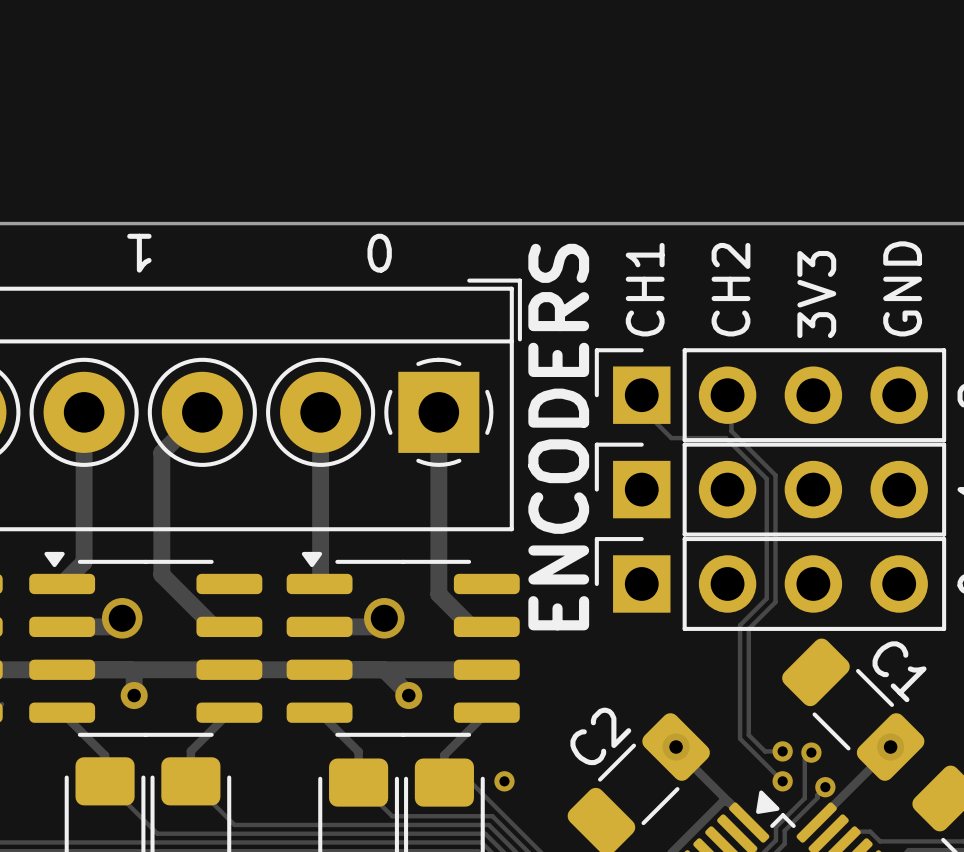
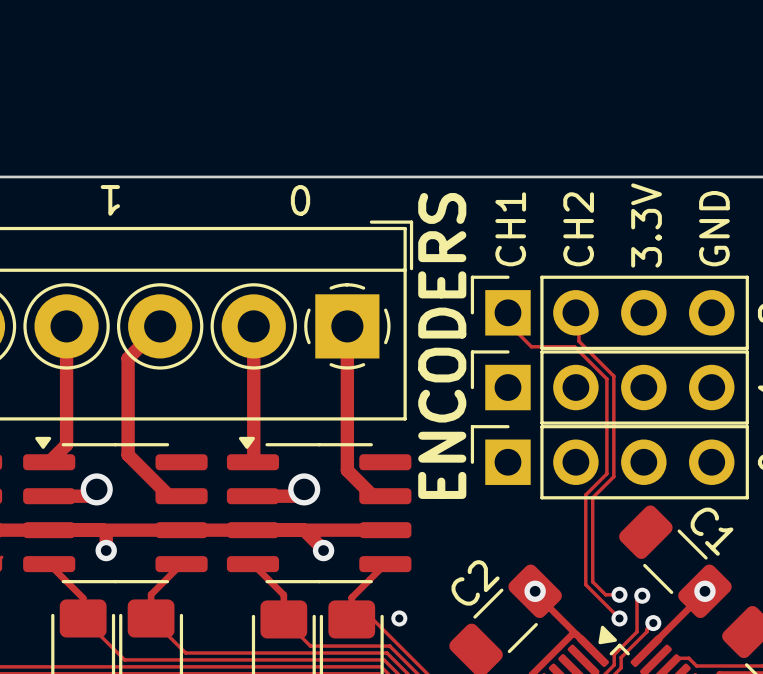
text: 3V3 (816, 294) -> 3.3V (646, 225)

